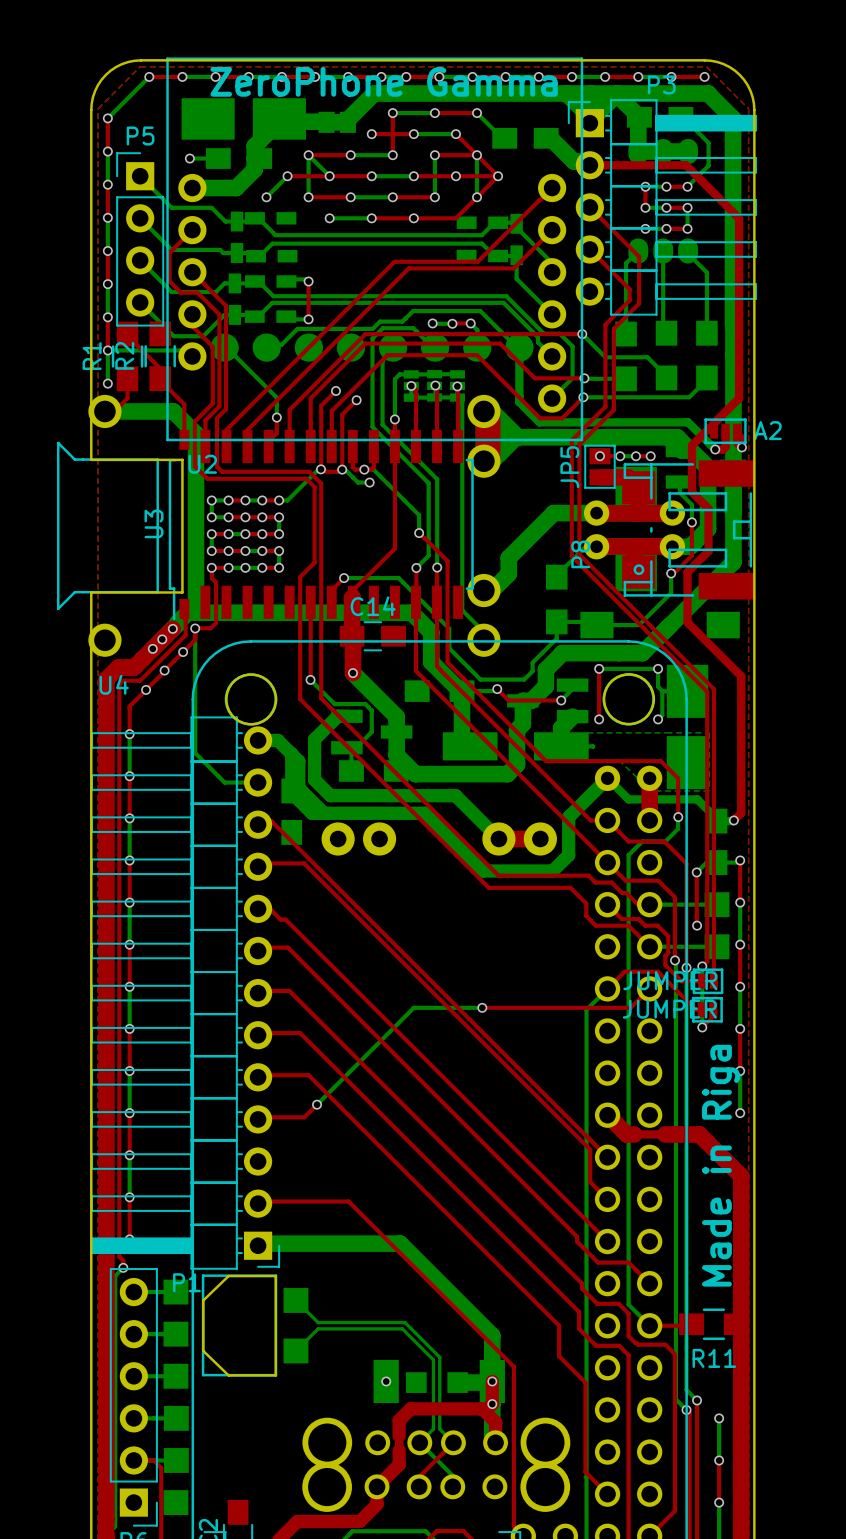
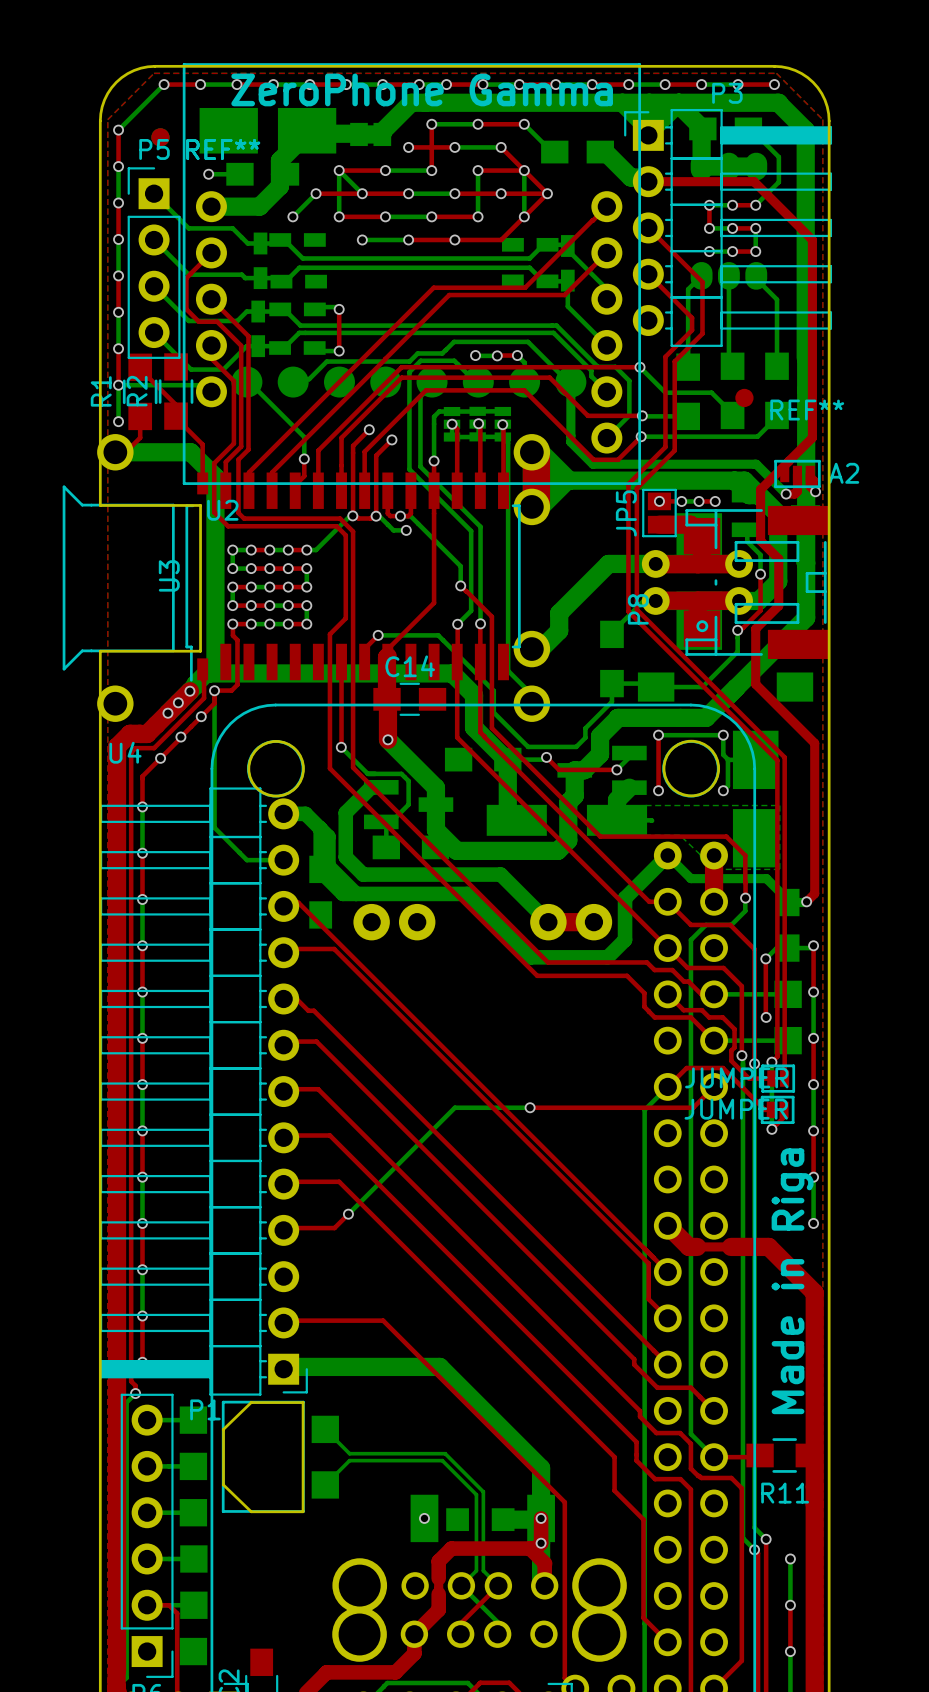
REF**: none -> (160, 137)
REF**: none -> (160, 137)
REF**: none -> (744, 397)

